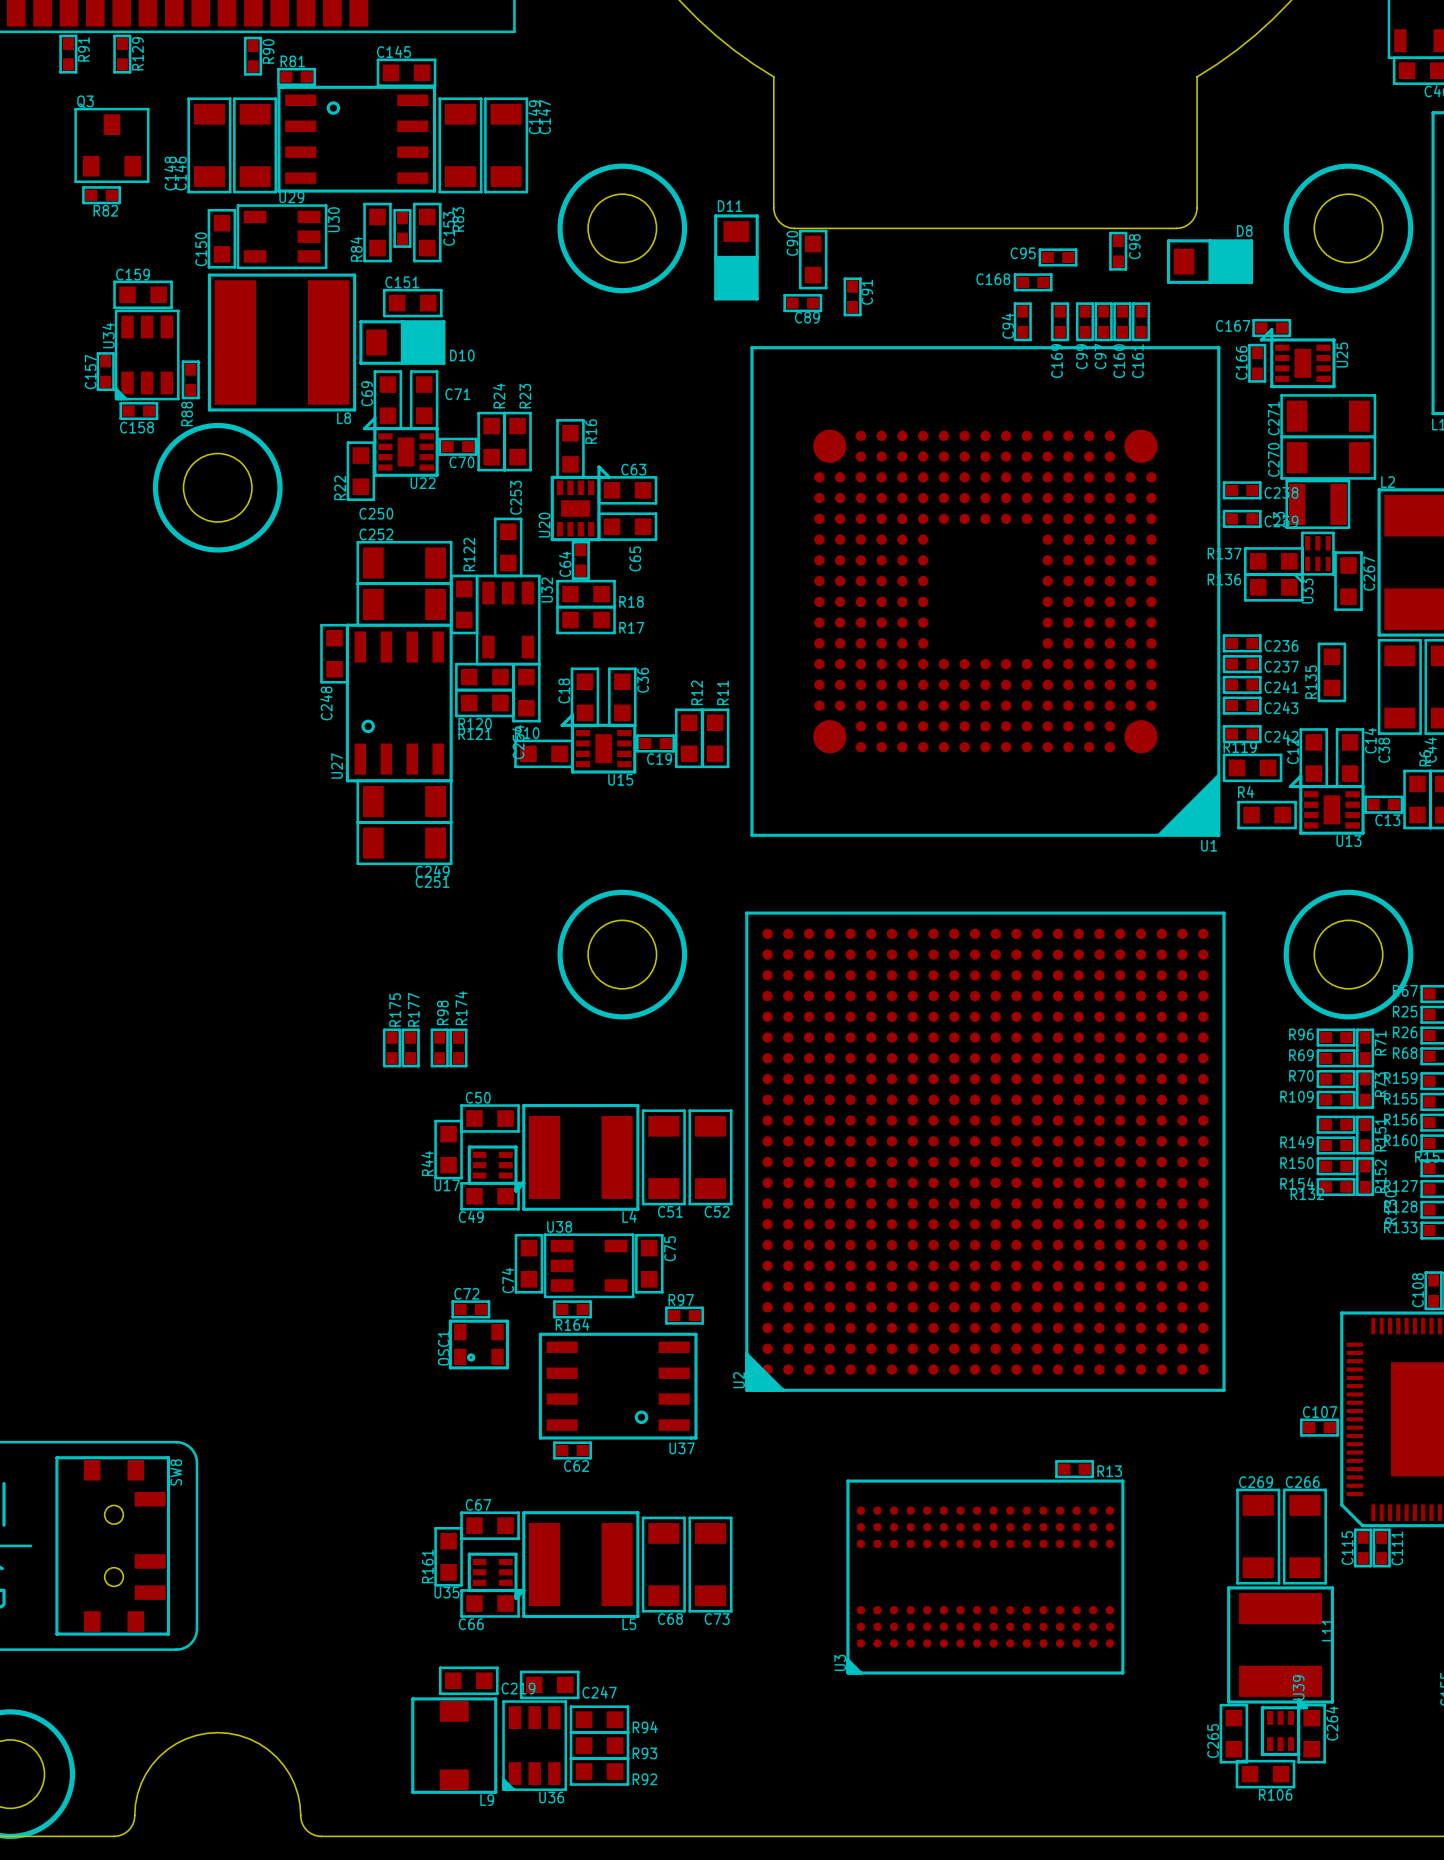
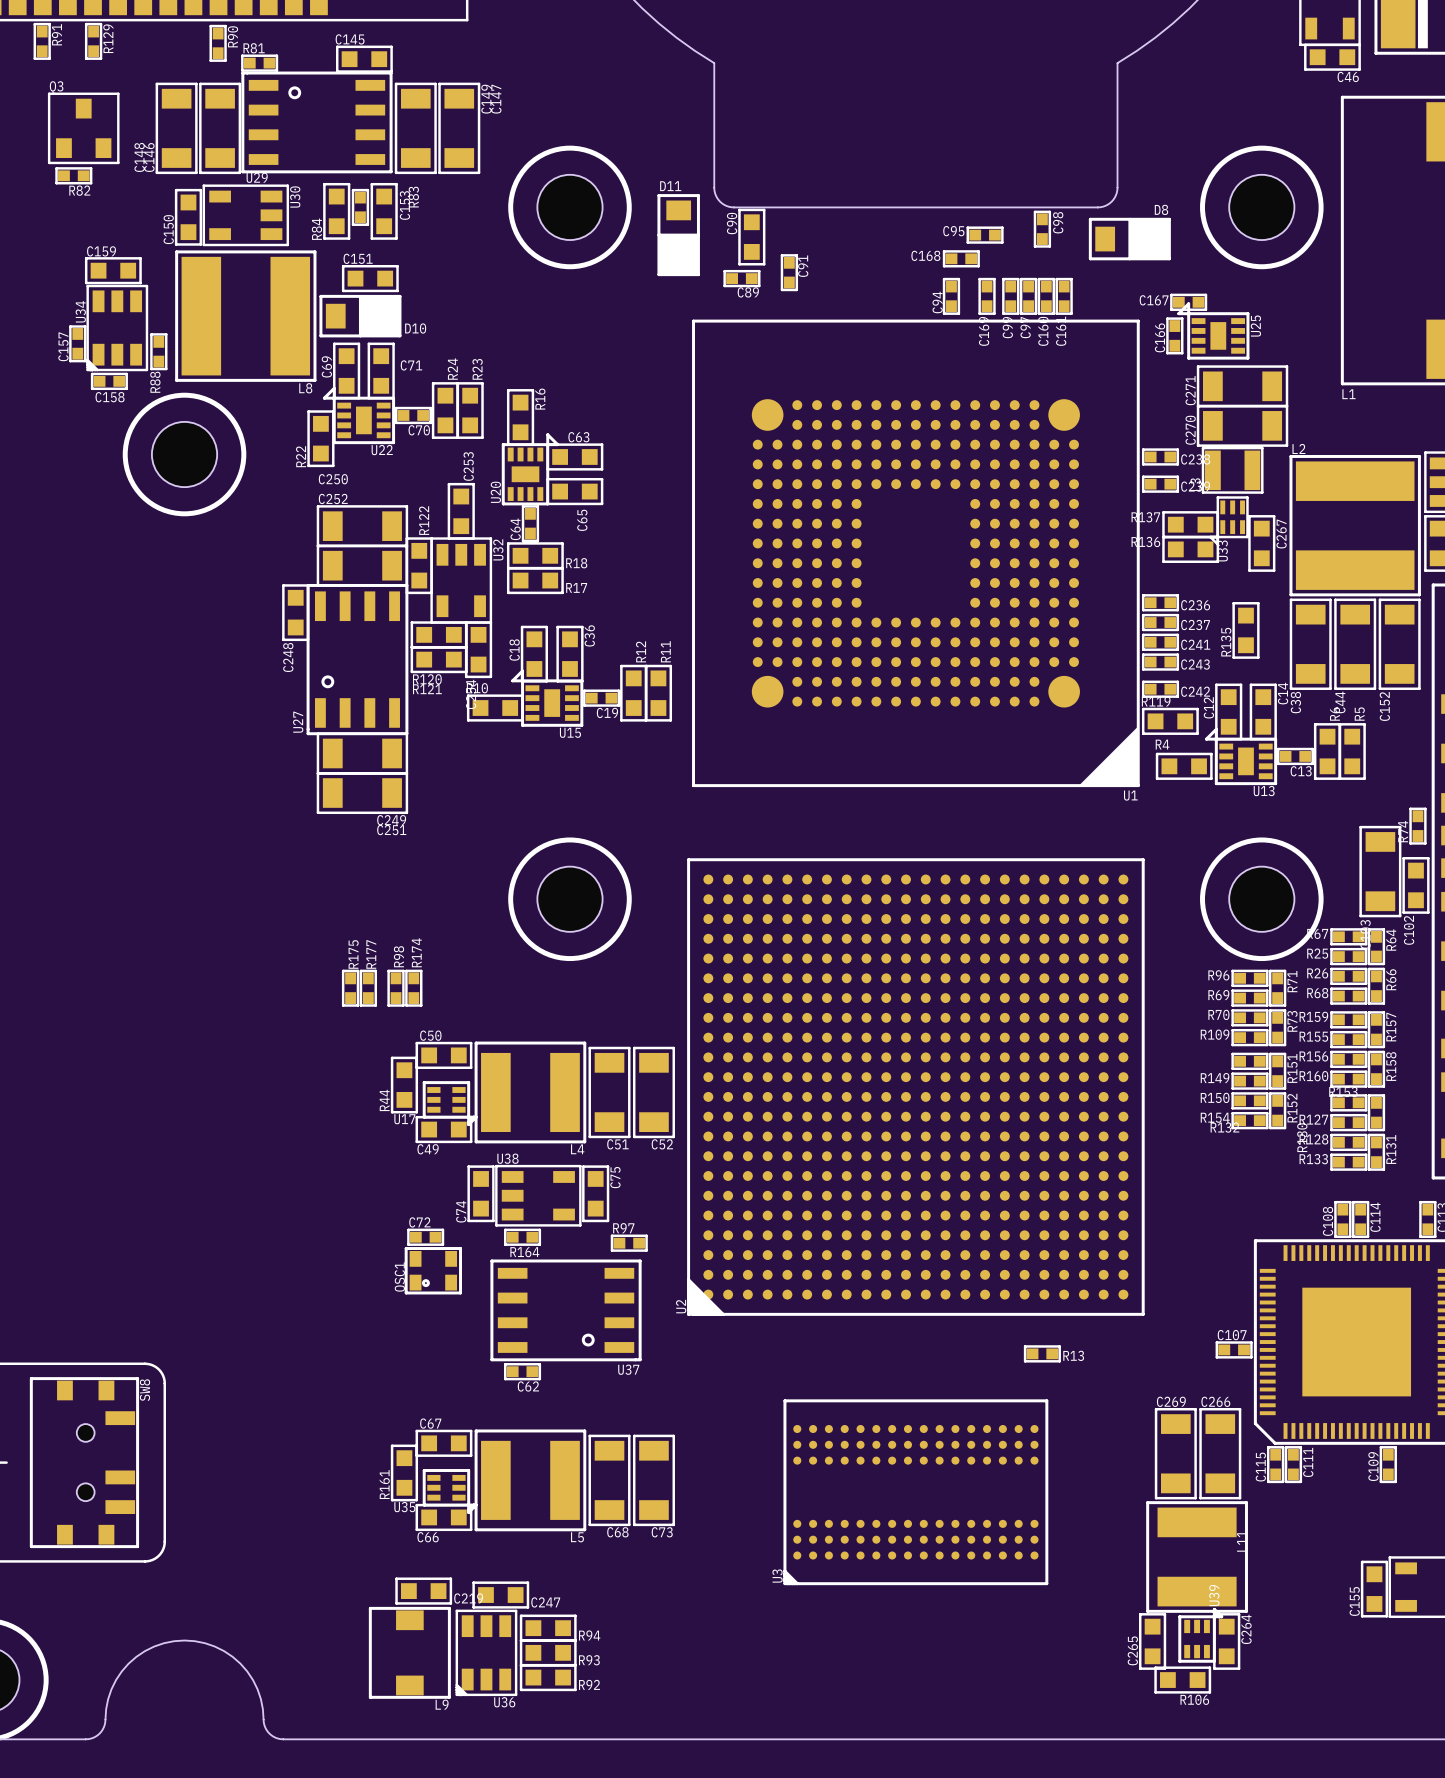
R13 position: (1074, 1469) -> (1042, 1353)

